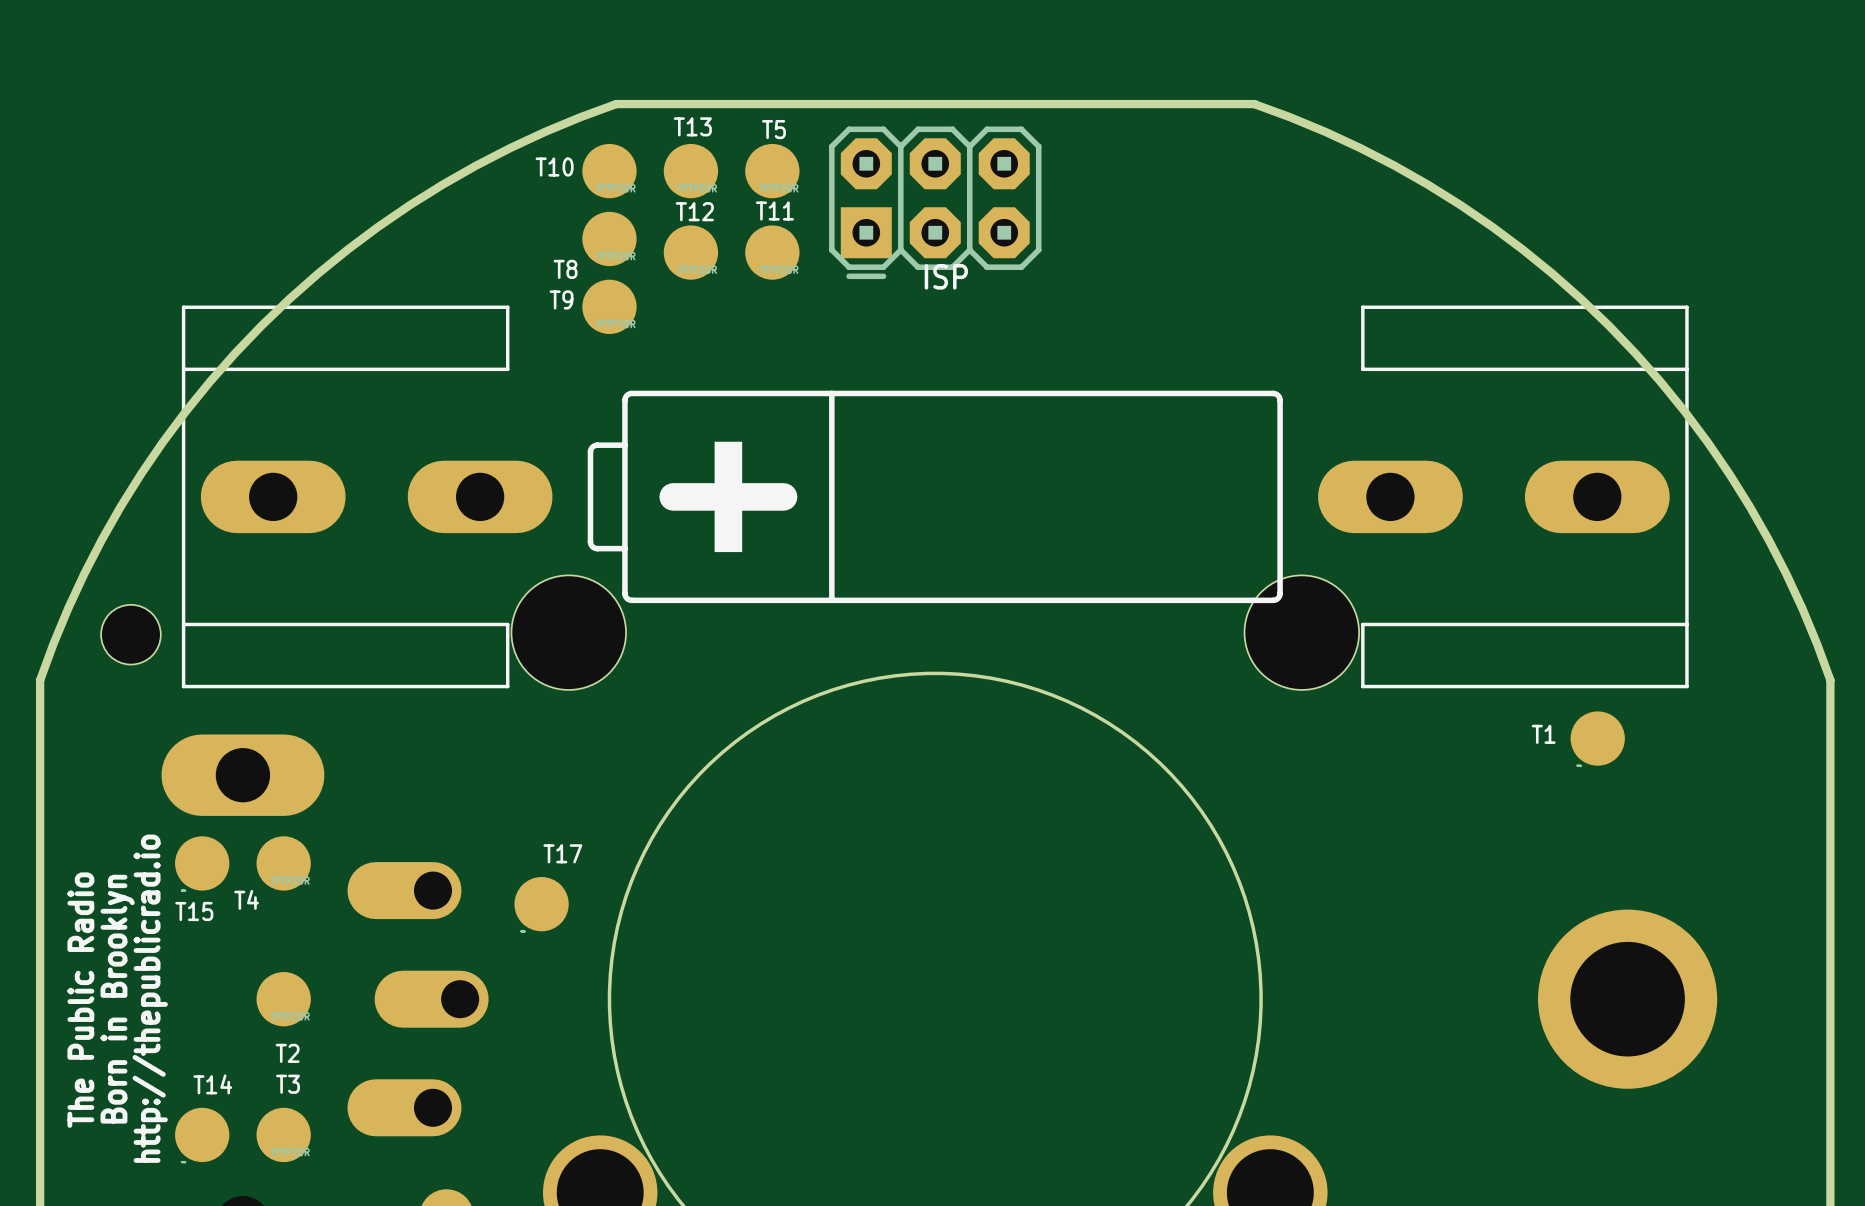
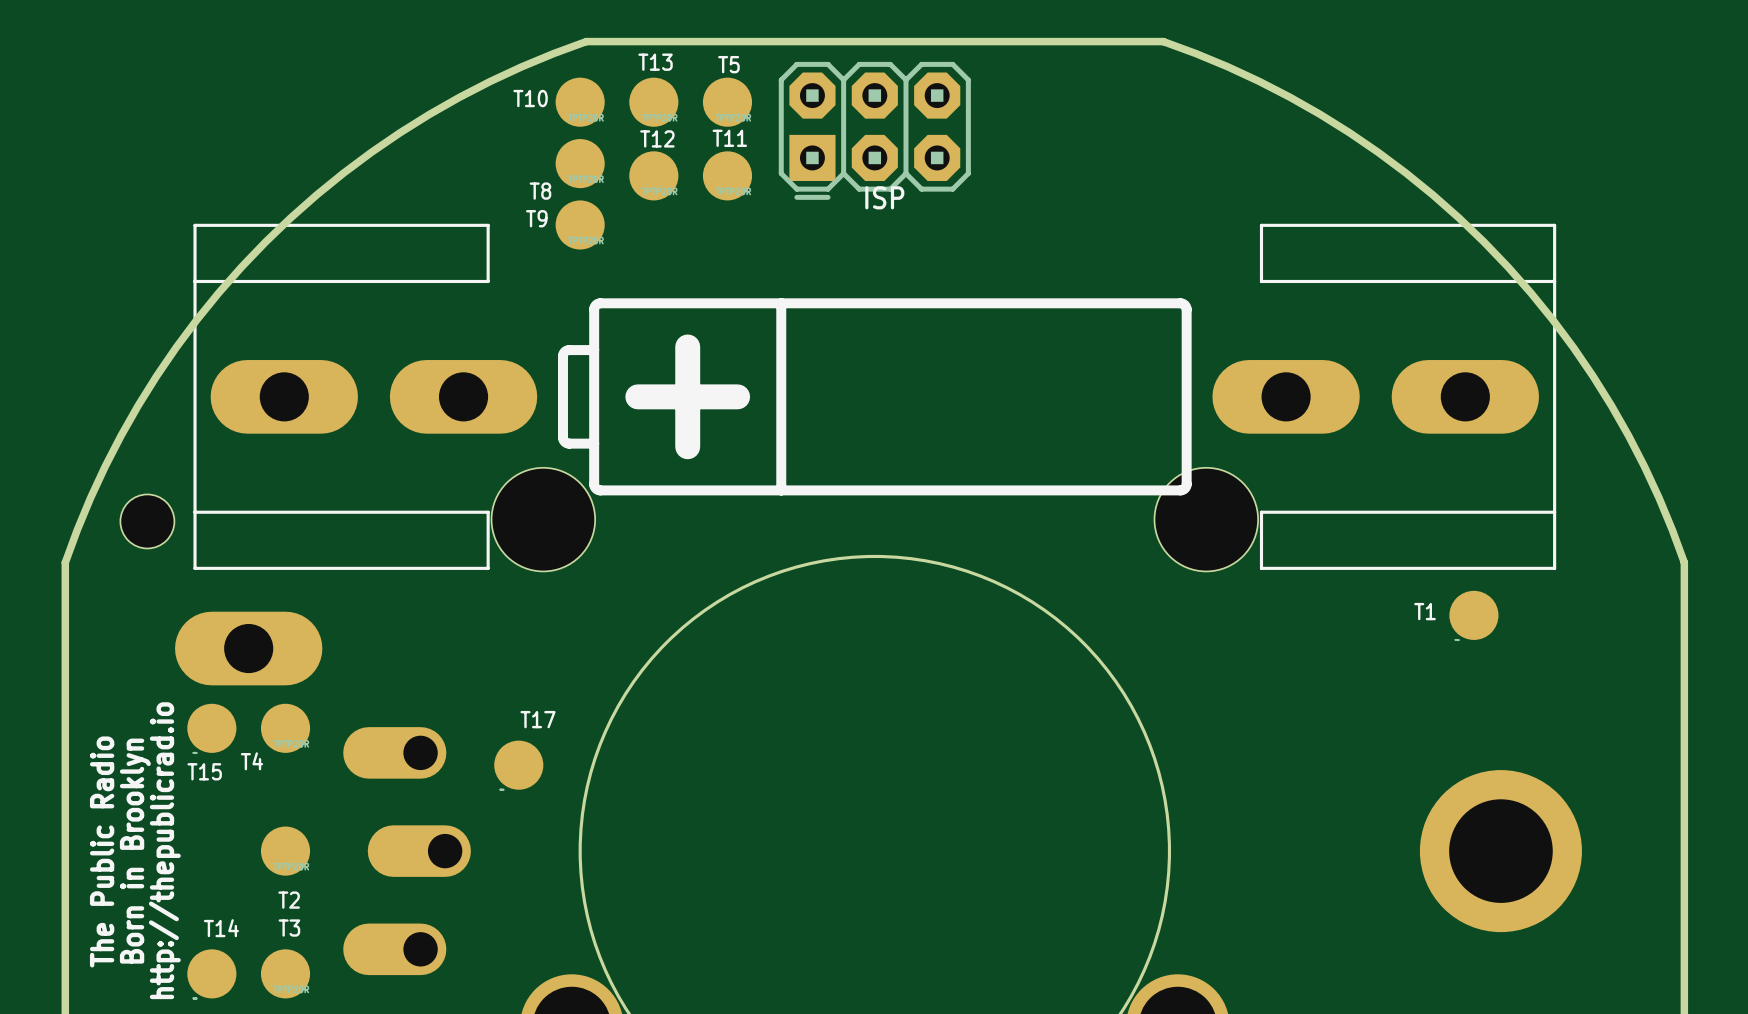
part footprint: [181, 305, 1689, 689] -> [193, 223, 1557, 570]

